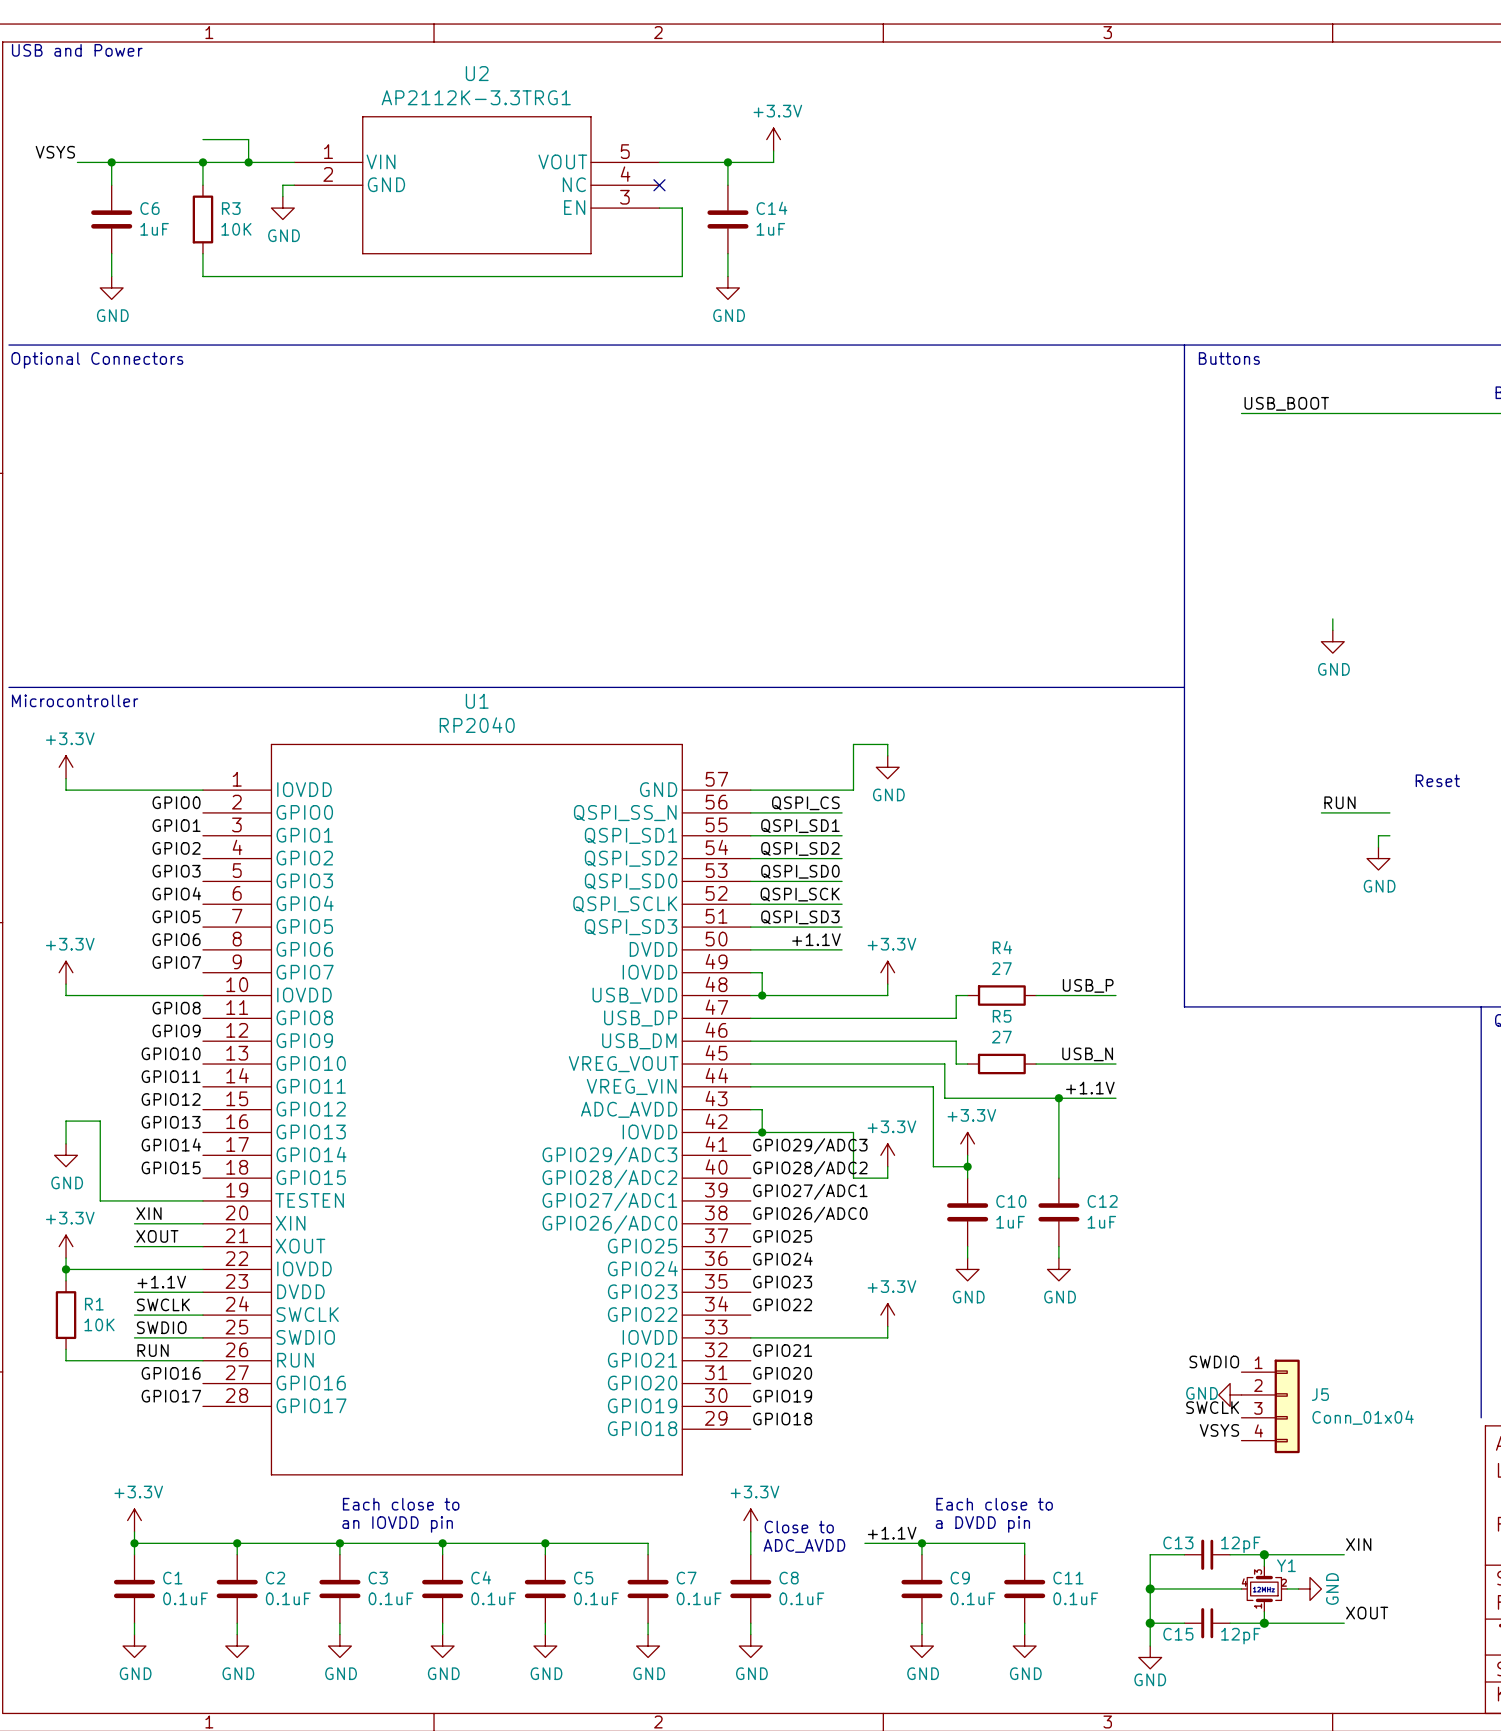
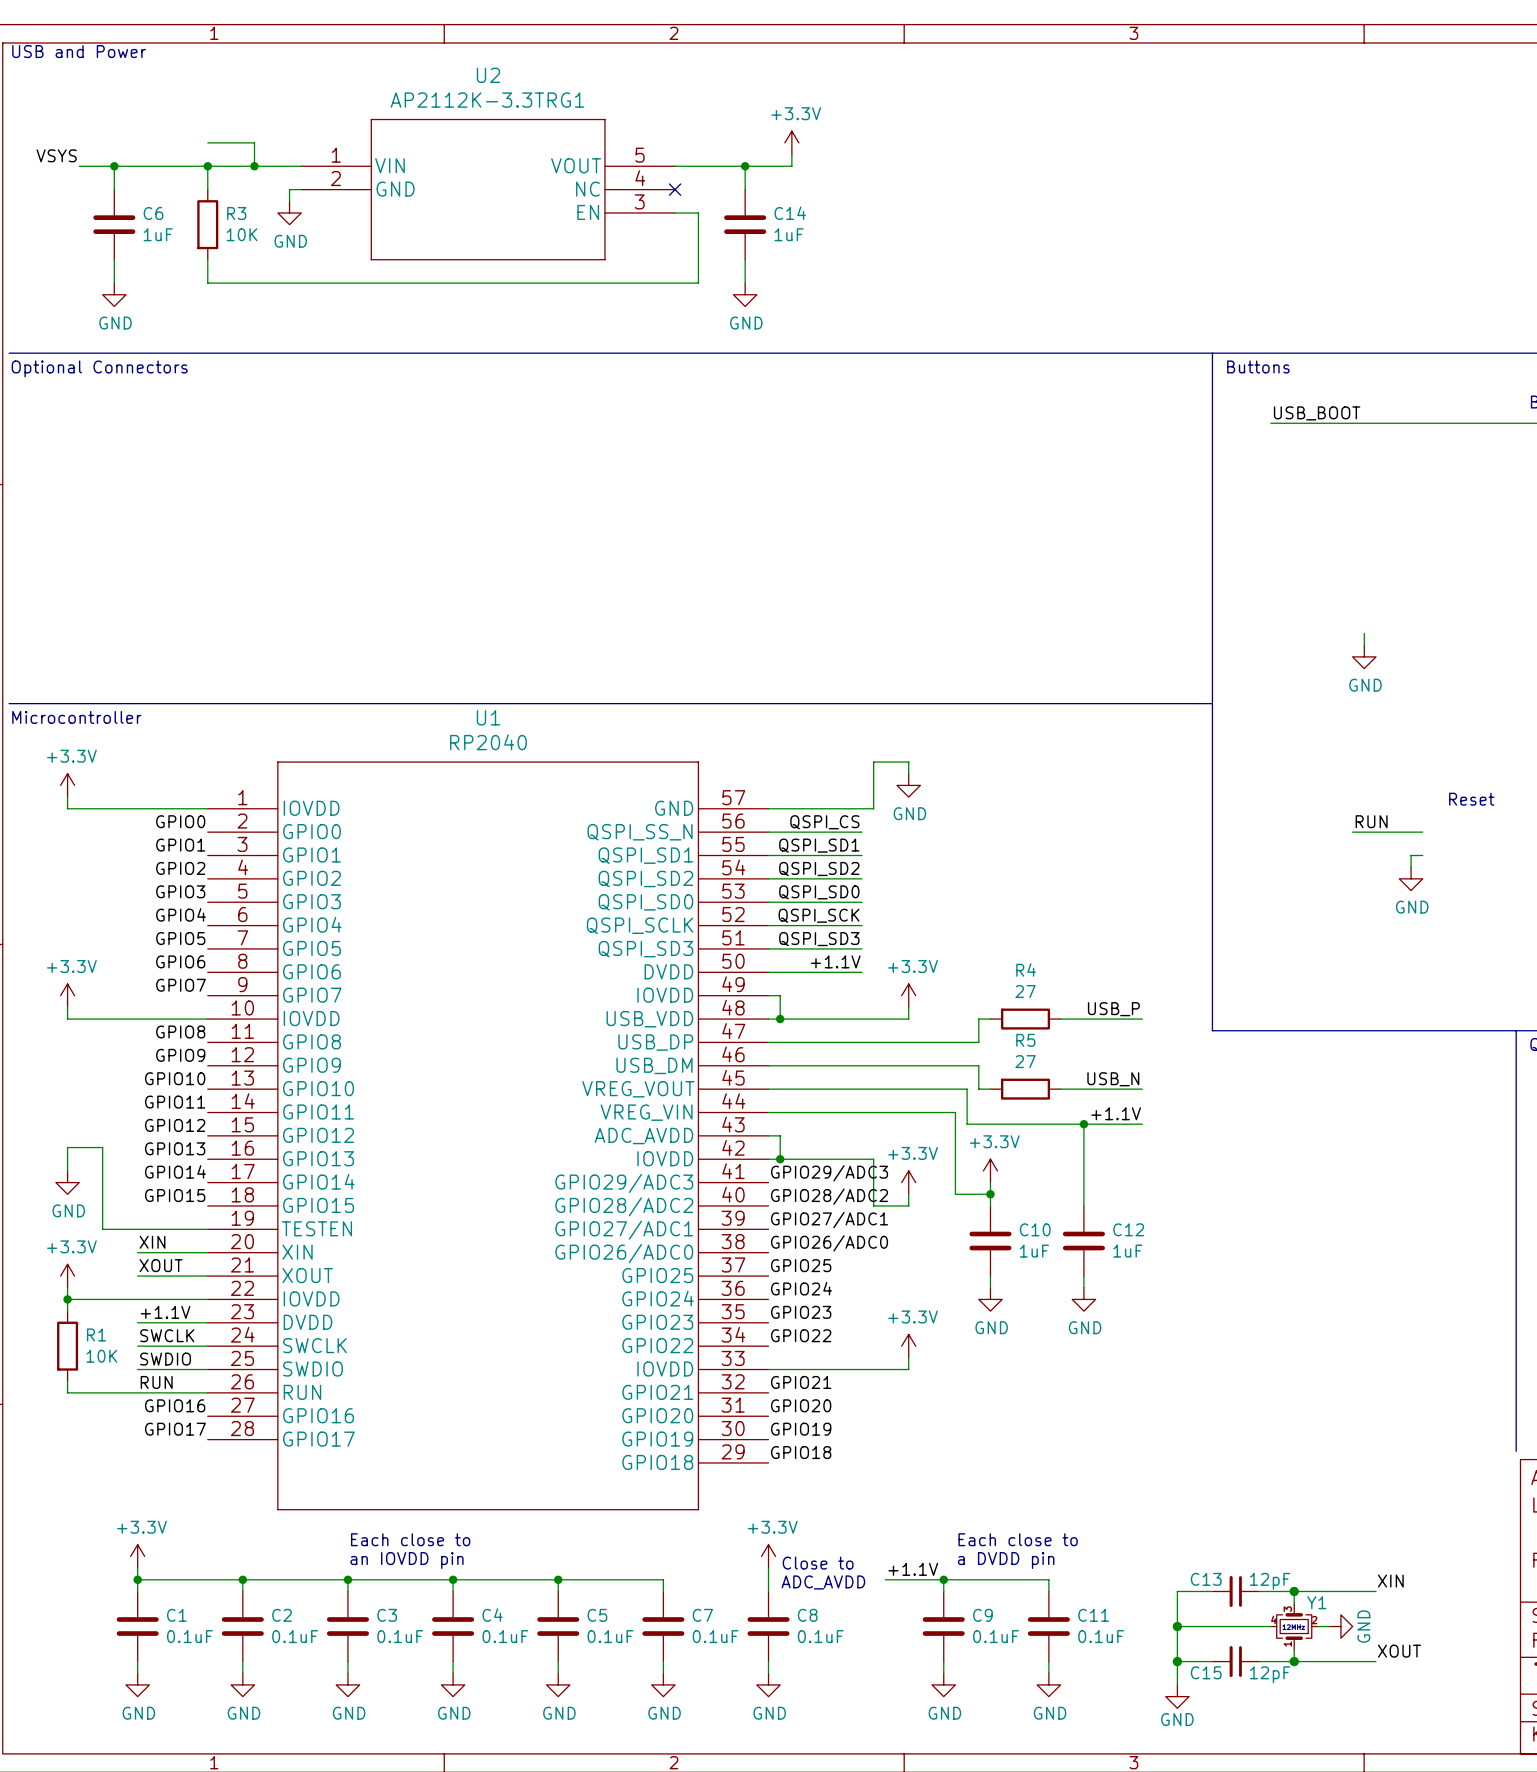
label: SWDIO (1214, 1361) -> none
power symbol: GND (1230, 1394) -> none
J5: Conn_01x04 (1270, 1406) -> none
label: SWCLK (1212, 1407) -> none
label: VSYS (1219, 1430) -> none

